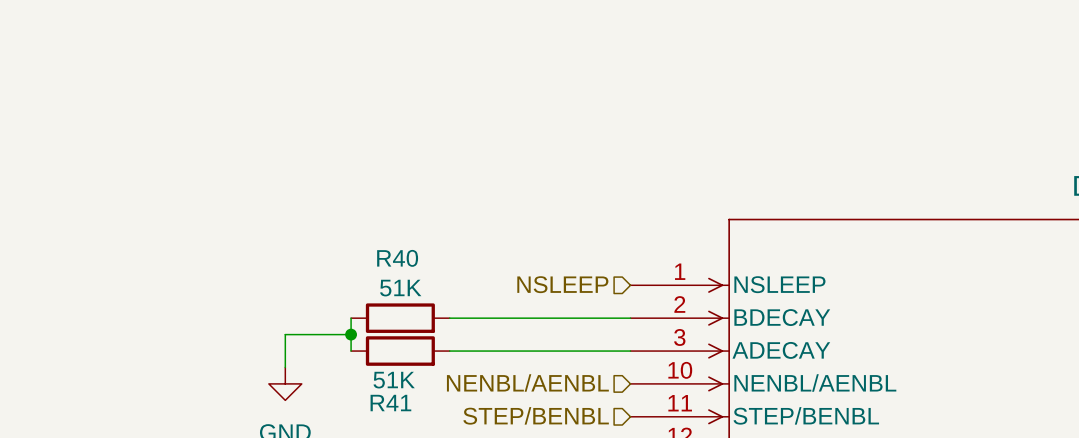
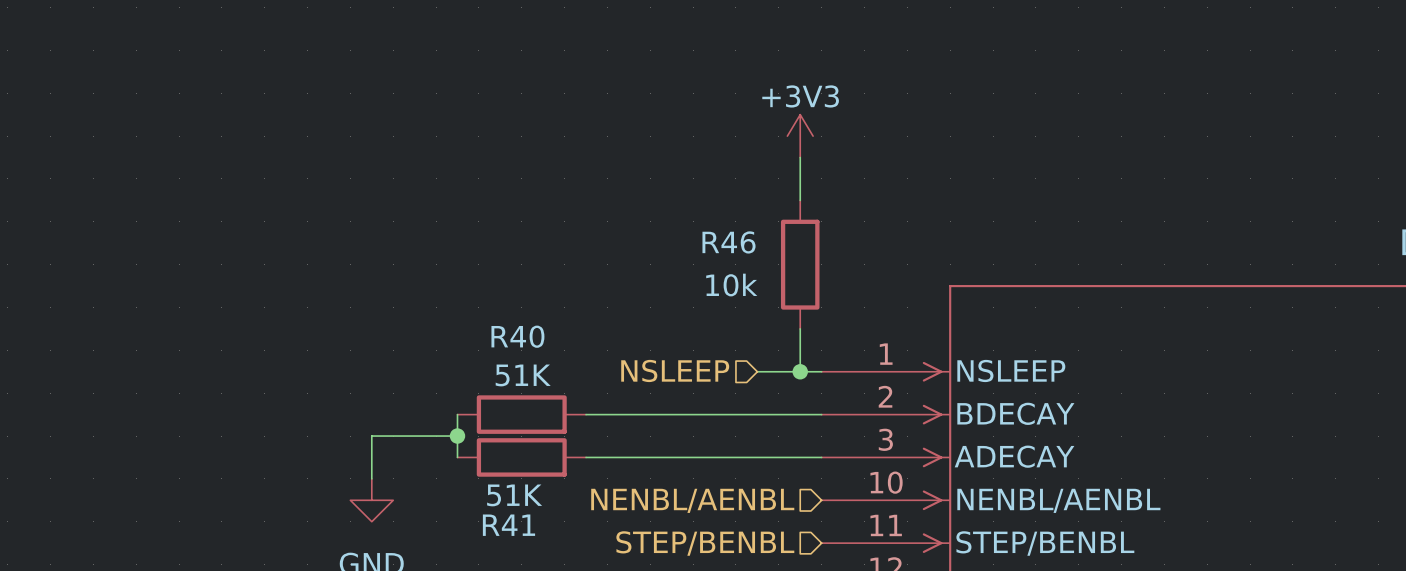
power symbol: none -> +3V3 (800, 136)
wire: none -> (800, 157) (800, 200)
R46: none -> 10k (800, 264)
wire: none -> (800, 328) (800, 371)
hierarchical label position: NSLEEP (562, 284) -> NSLEEP (675, 370)
wire: none -> (757, 371) (821, 371)
junction: none -> (800, 371)

